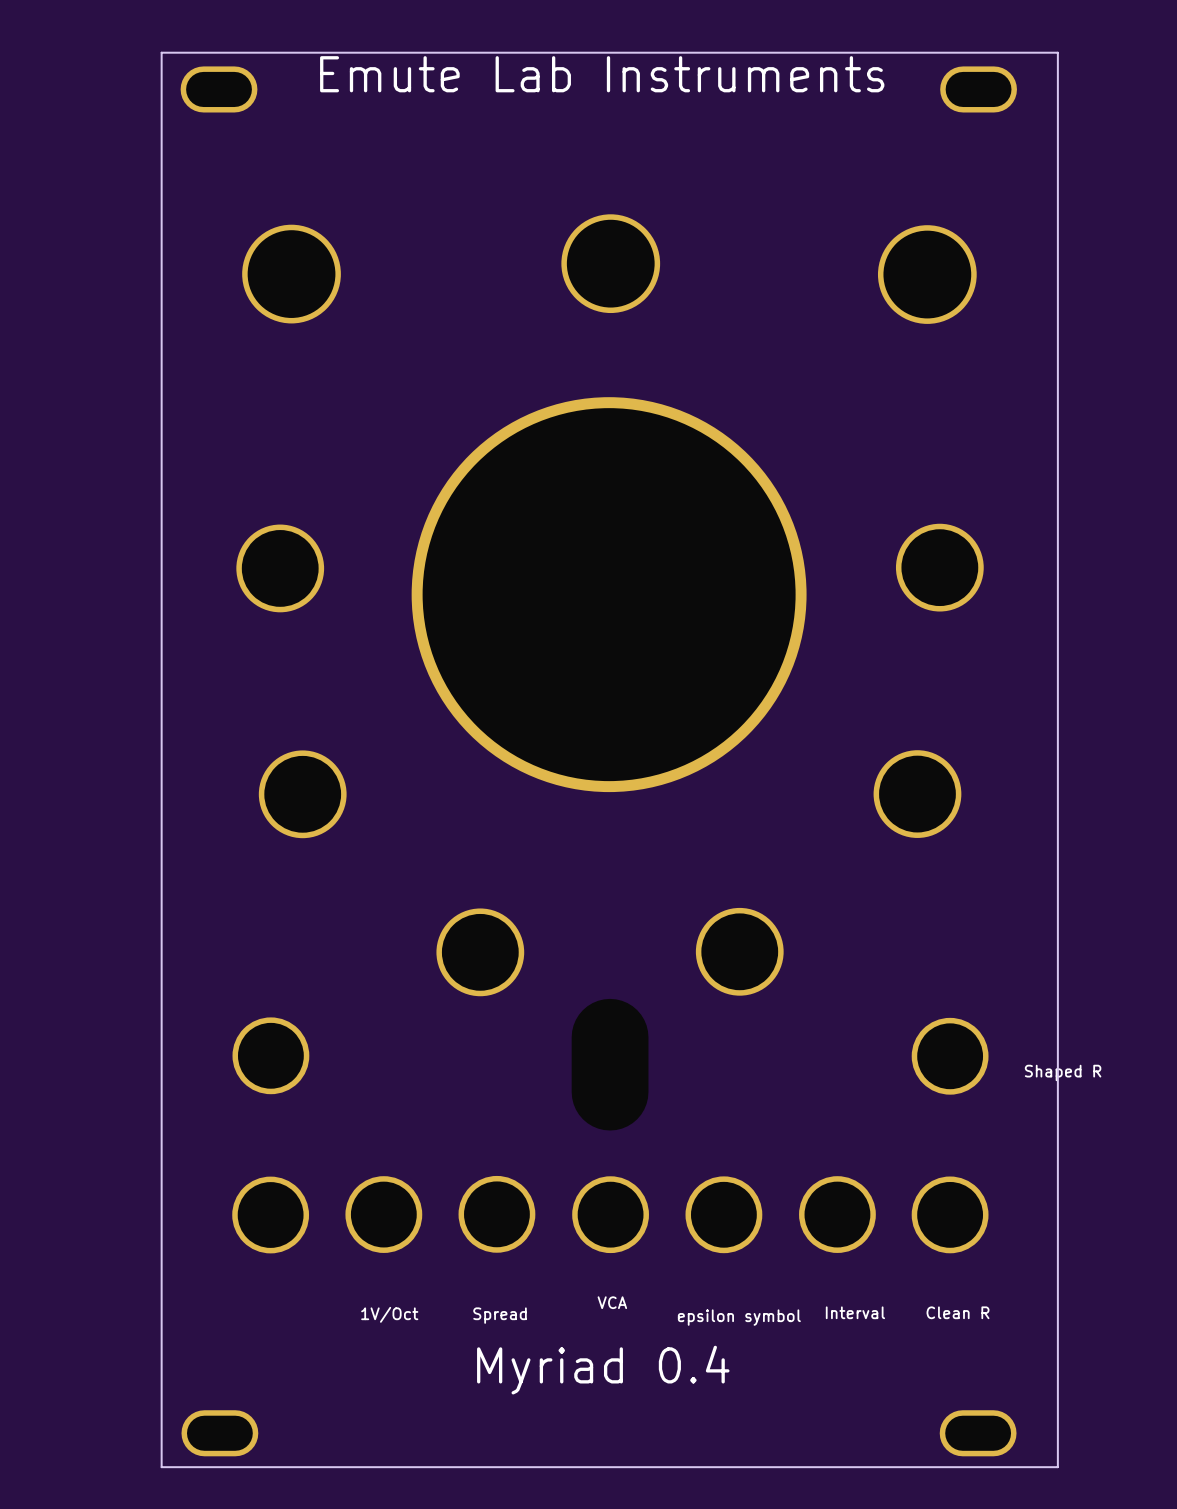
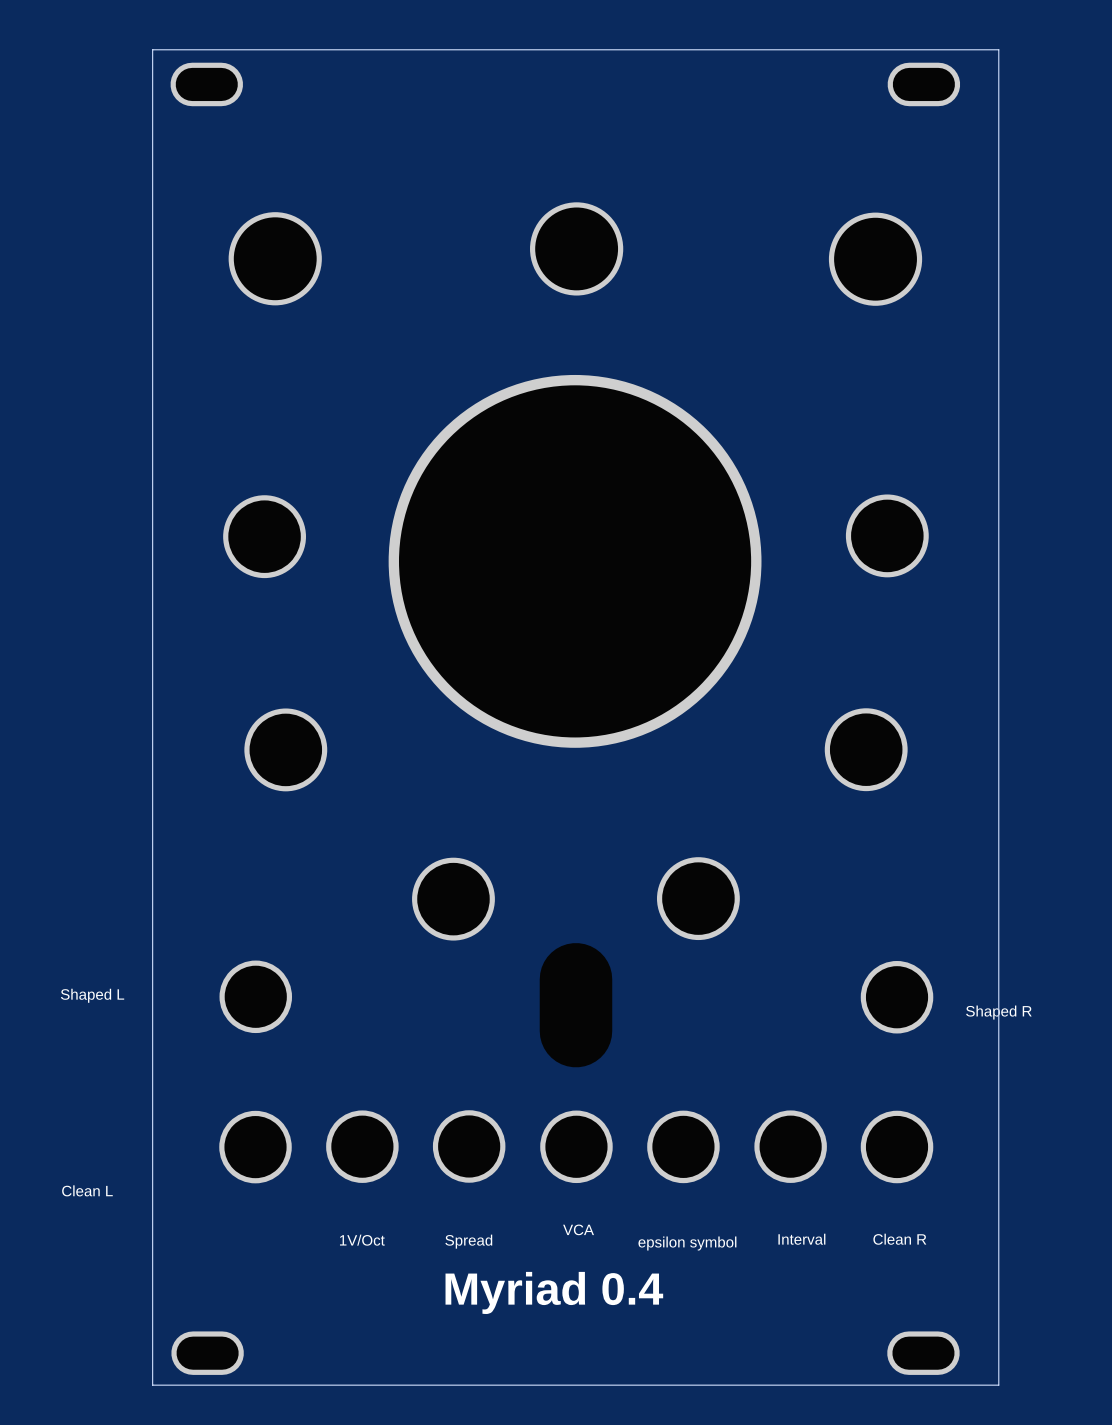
text: Emute Lab Instruments (602, 74) -> none
text: none -> Shaped L (92, 995)
text: none -> Clean L (87, 1190)

